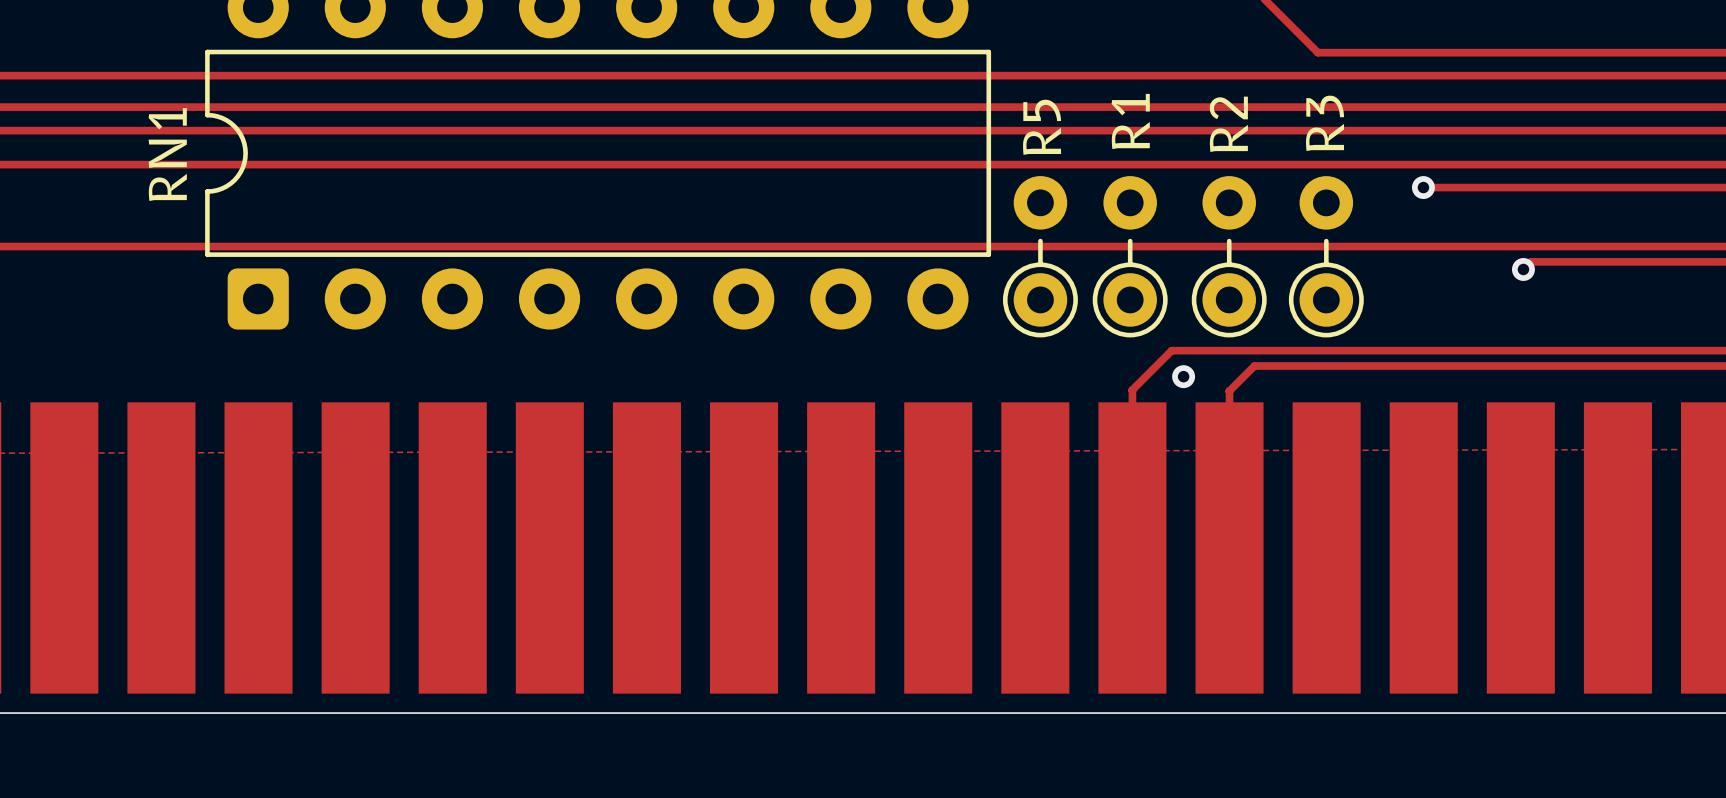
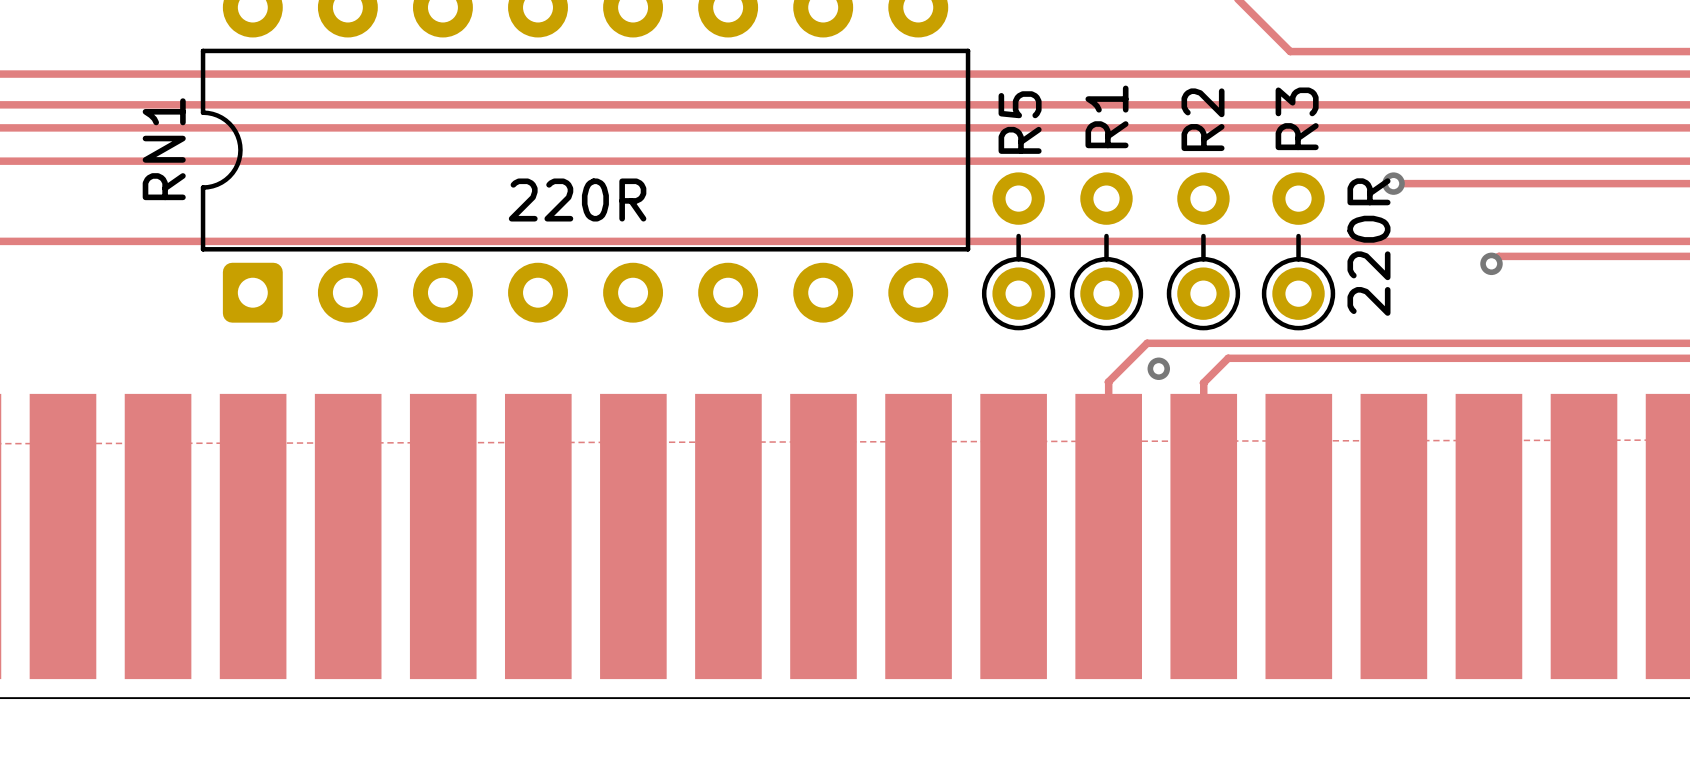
RN1 value: none -> 220R (577, 199)
R3 value: none -> 220R (1368, 247)

